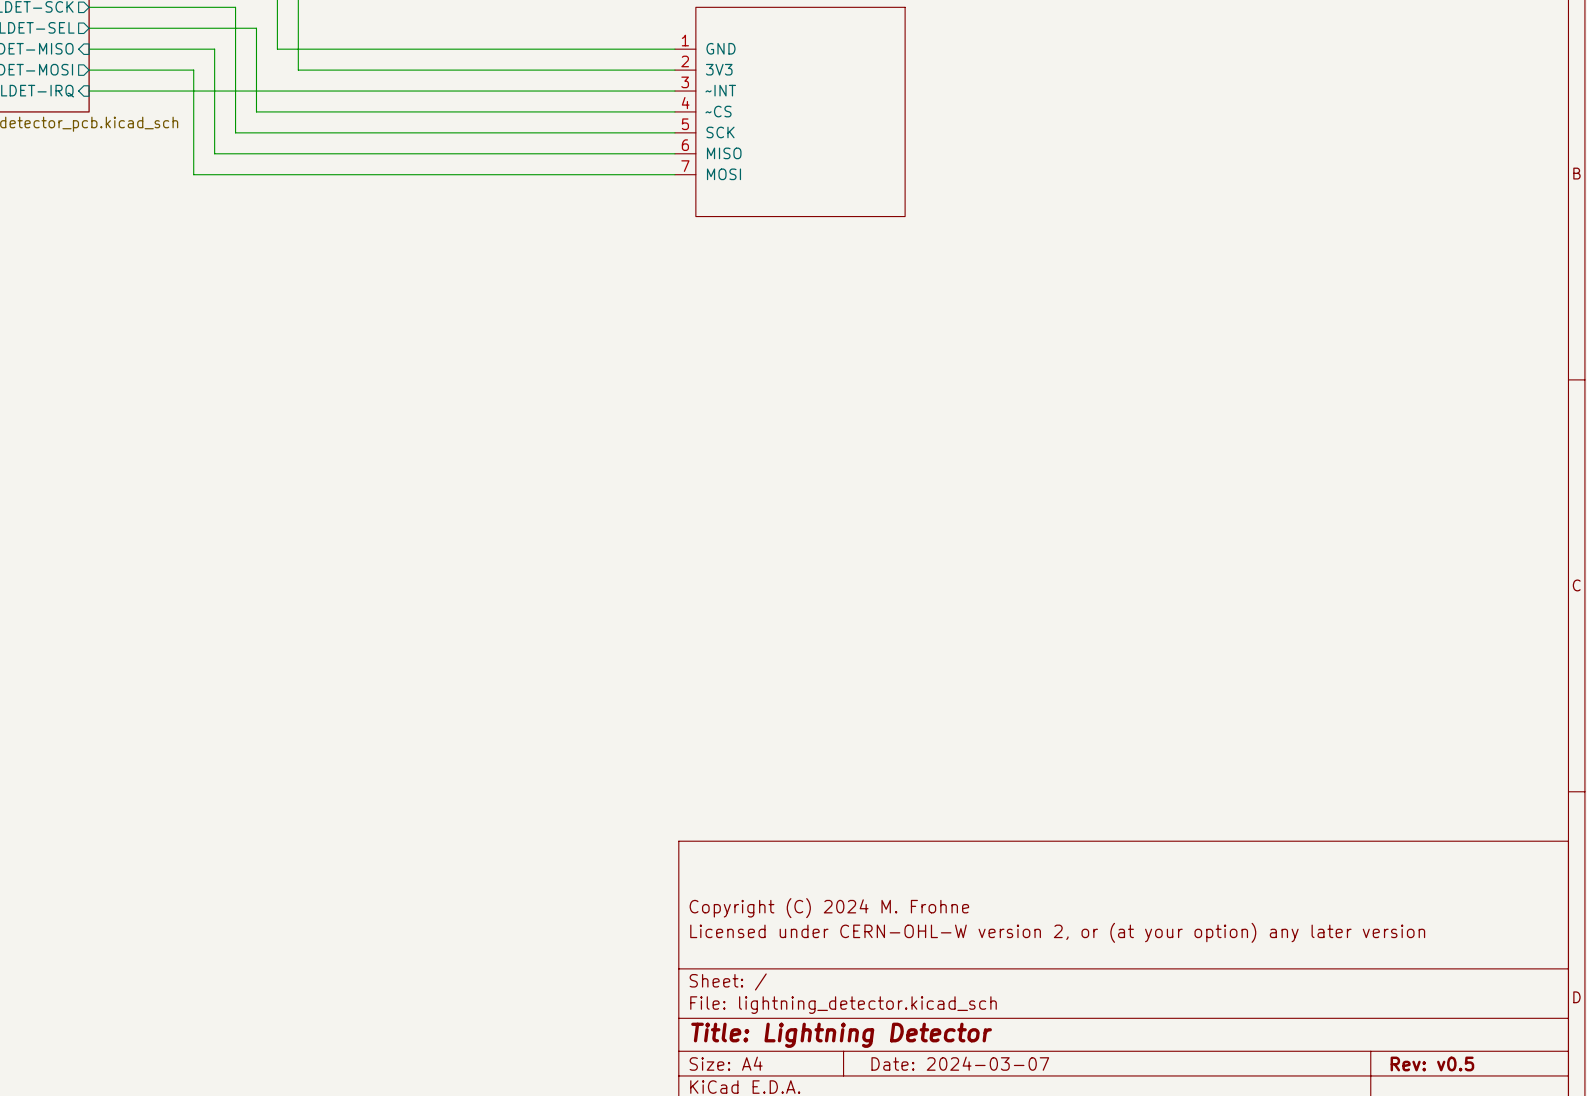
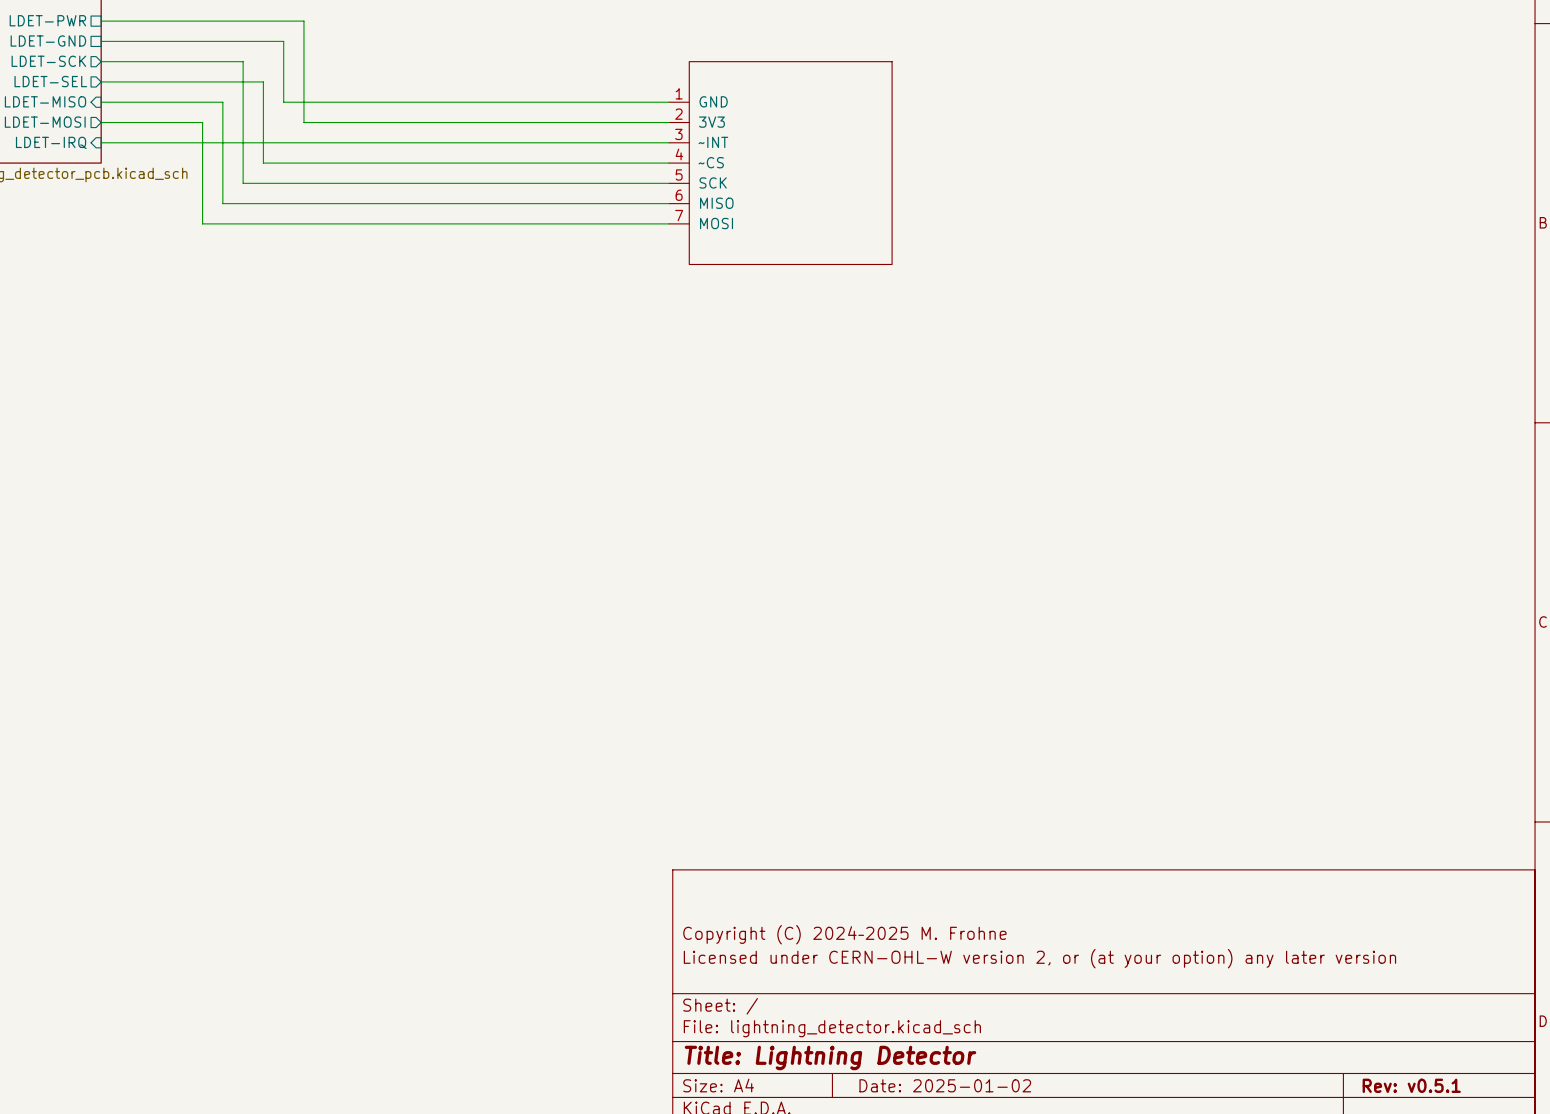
title block: Copyright (C) 2024 M. Frohne (829, 908) -> Copyright (C) 2024–2025 M. Frohne (844, 934)
title block: Date: 2024-03-07 (960, 1063) -> Date: 2025-01-02 (945, 1085)
title block: Rev: v0.5 (1432, 1063) -> Rev: v0.5.1 (1411, 1085)

